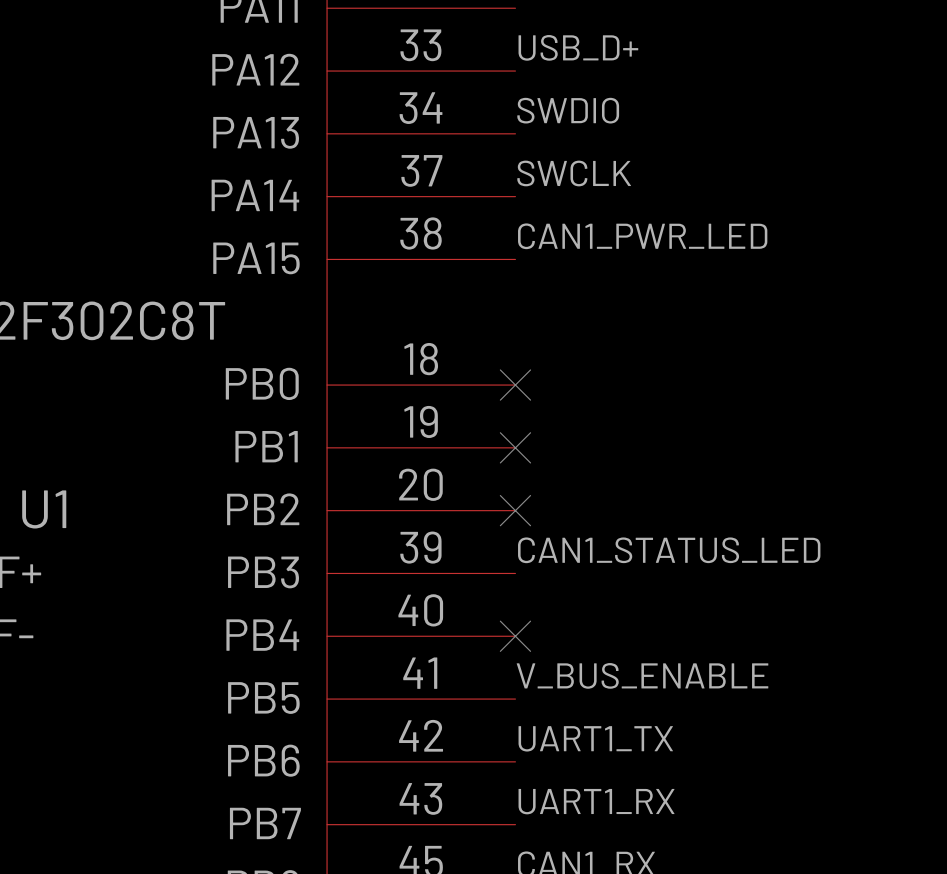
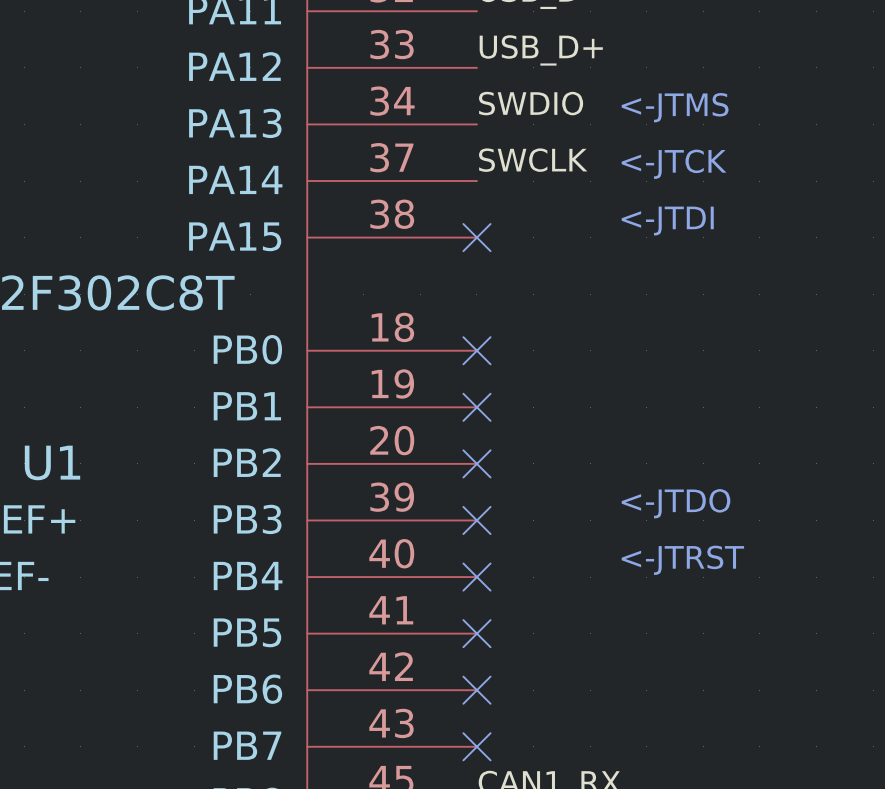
text: none -> <-JTMS (675, 107)
text: none -> <-JTCK (674, 164)
label: CAN1_PWR_LED (642, 236) -> none
text: none -> <-JTDI (667, 221)
no-connect mark: none -> (476, 237)
label: CAN1_STATUS_LED (669, 550) -> none
text: none -> <-JTDO (676, 503)
no-connect mark: none -> (476, 520)
text: none -> <-JTRST (682, 560)
label: V_BUS_ENABLE (642, 675) -> none
no-connect mark: none -> (476, 633)
label: UART1_TX (595, 738) -> none
no-connect mark: none -> (476, 690)
label: UART1_RX (596, 801) -> none
no-connect mark: none -> (476, 746)

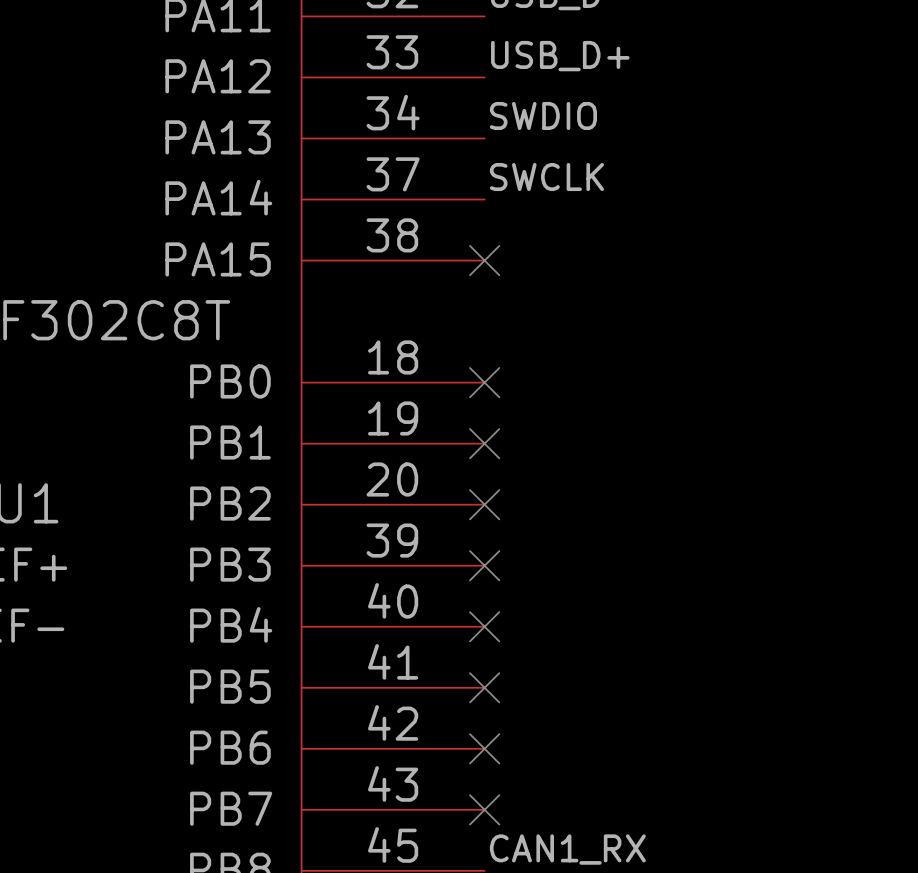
text: <-JTMS (675, 107) -> none
text: <-JTCK (674, 164) -> none
text: <-JTDI (667, 221) -> none
text: <-JTDO (676, 503) -> none
text: <-JTRST (682, 560) -> none

